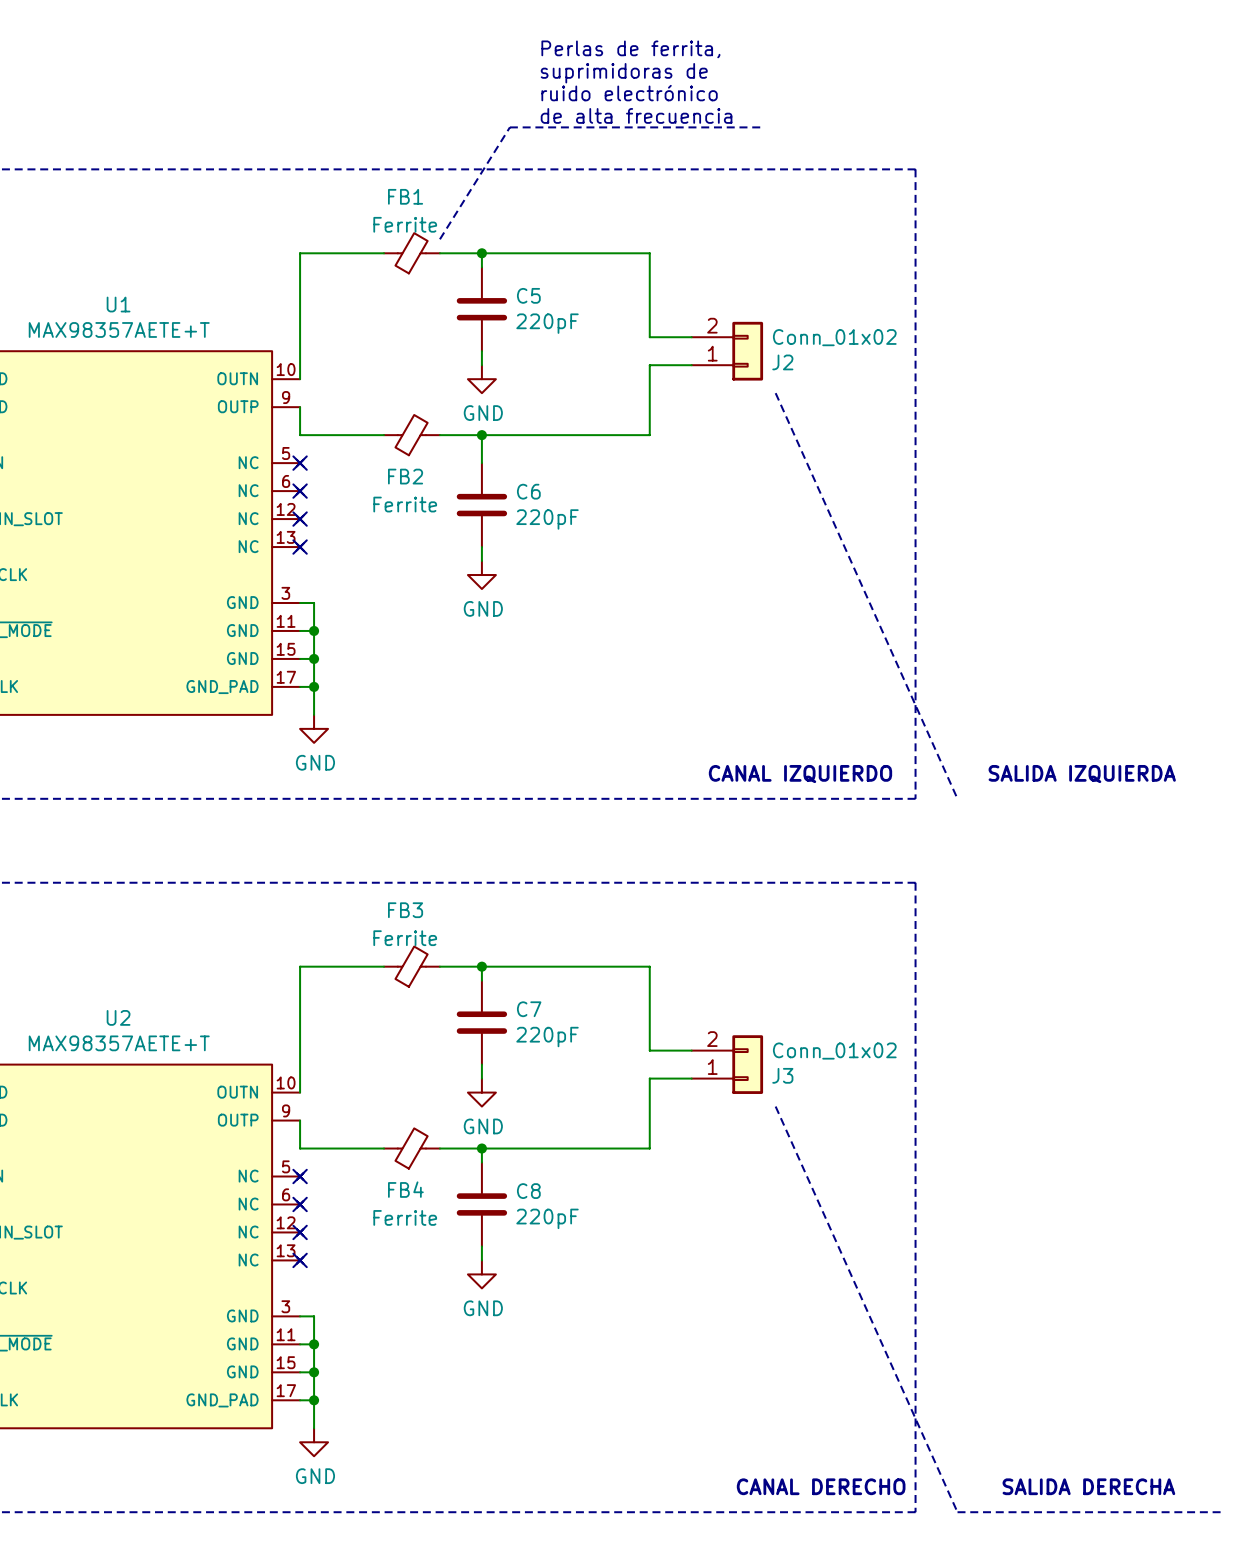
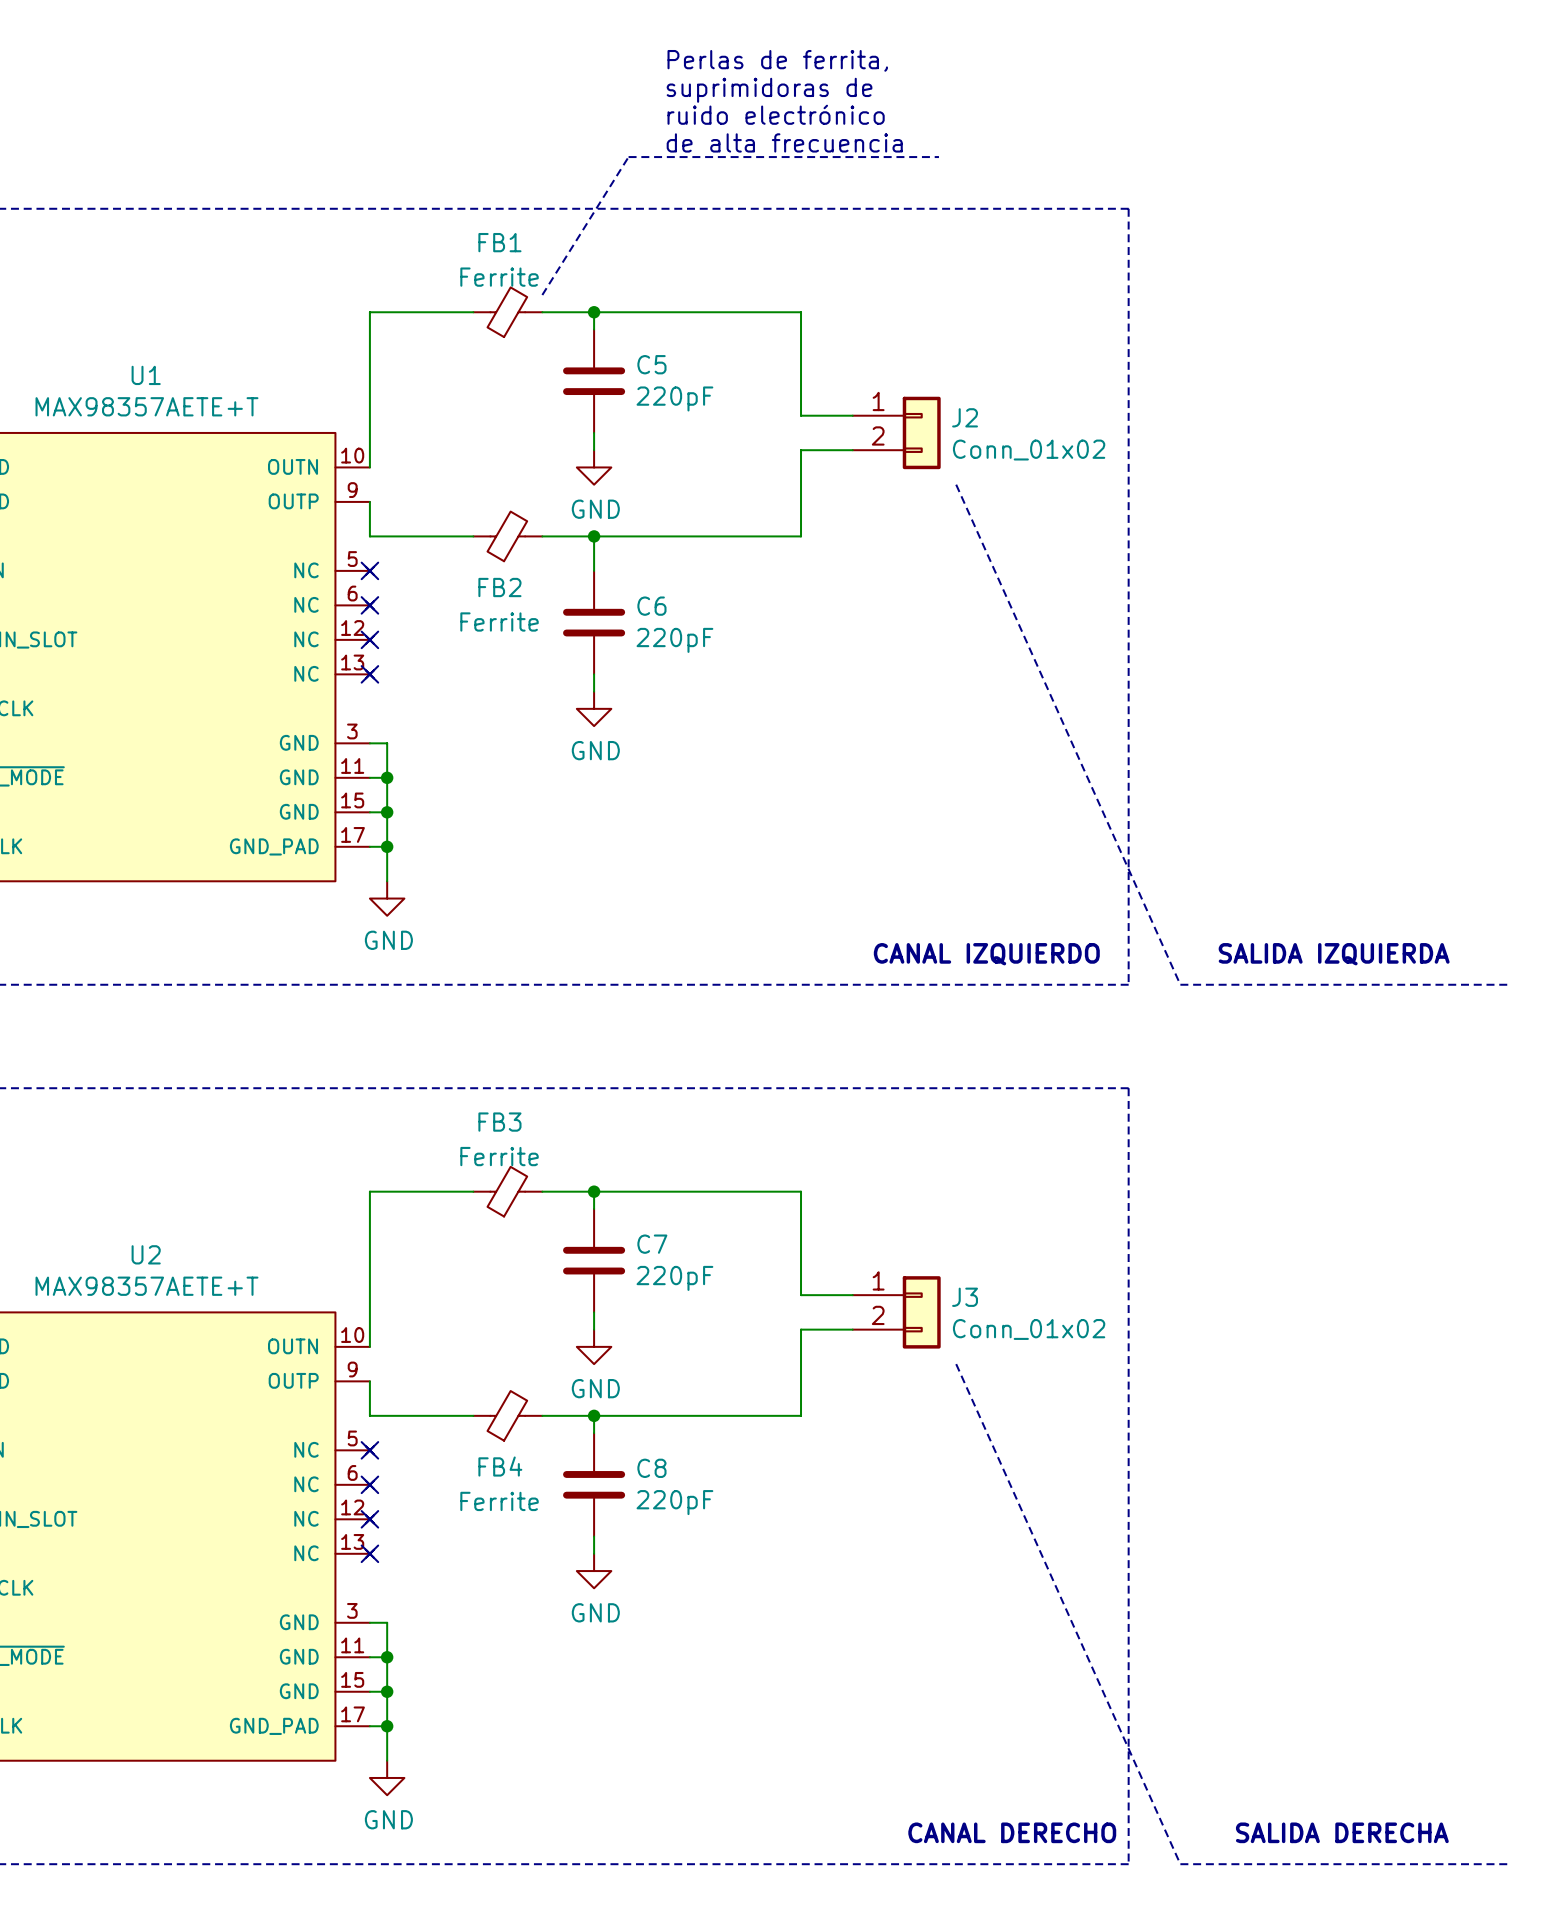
J2 flip: as is (747, 351) -> up-down (921, 432)
line: none -> (1180, 984) (1508, 984)
J3 flip: as is (747, 1064) -> up-down (921, 1312)

